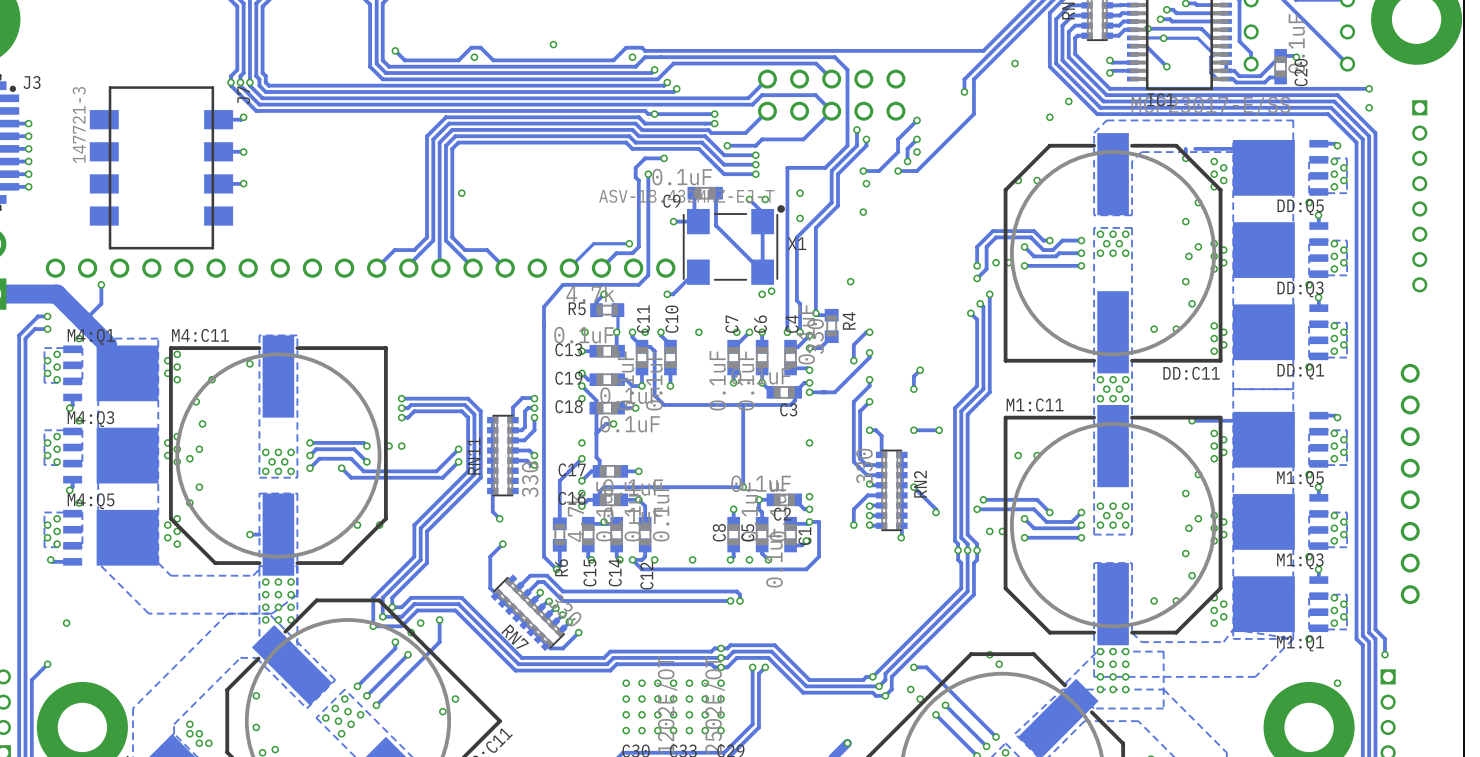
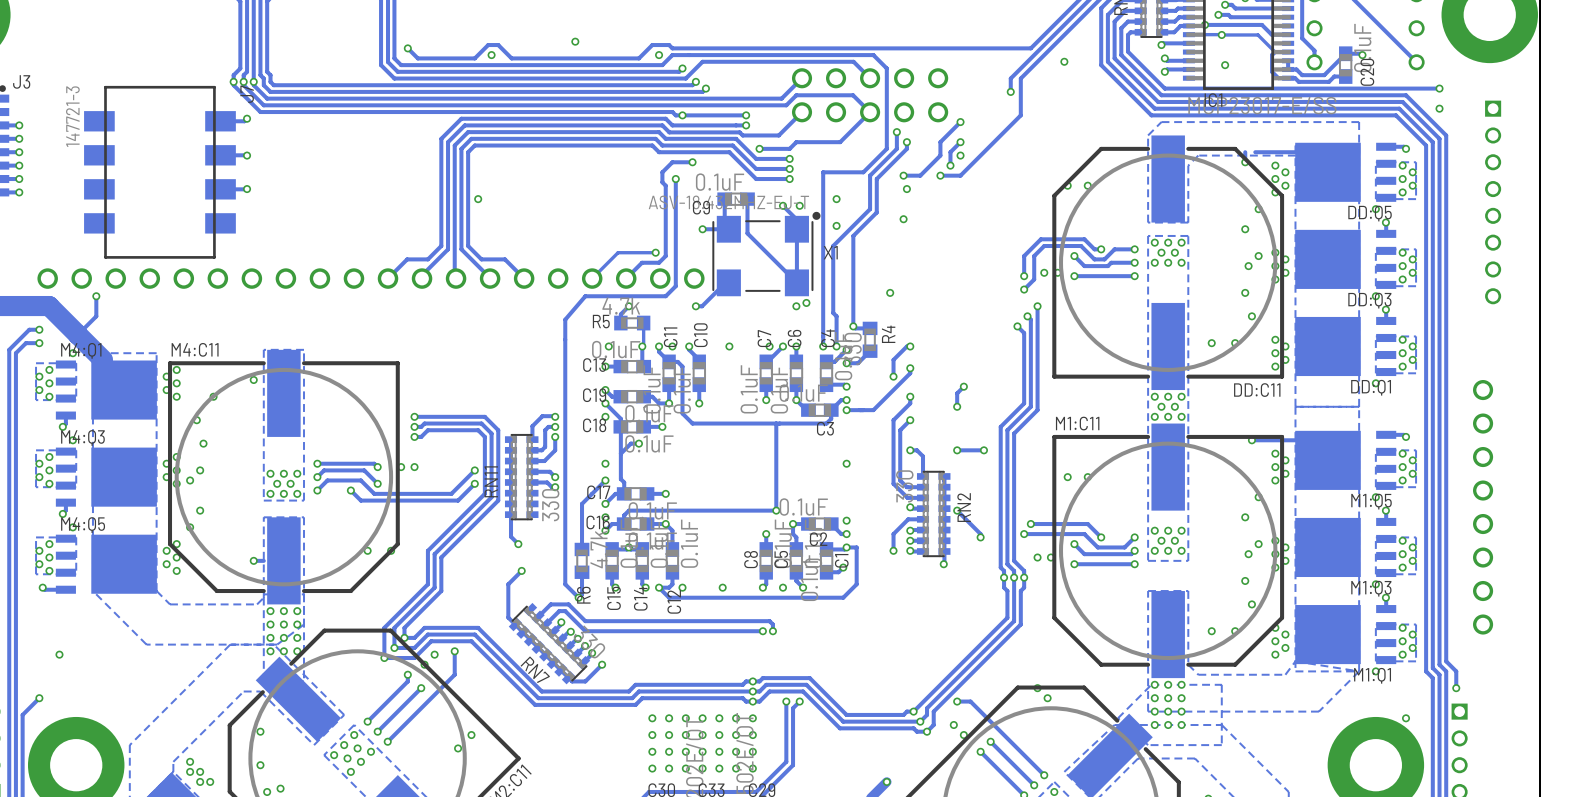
track: (1132, 46) (1146, 46) (1166, 66) -> (1188, 43) (1163, 43) (1161, 45)
via: none -> (1161, 45)
via: (1068, 101) -> none
via: (1049, 117) -> none

